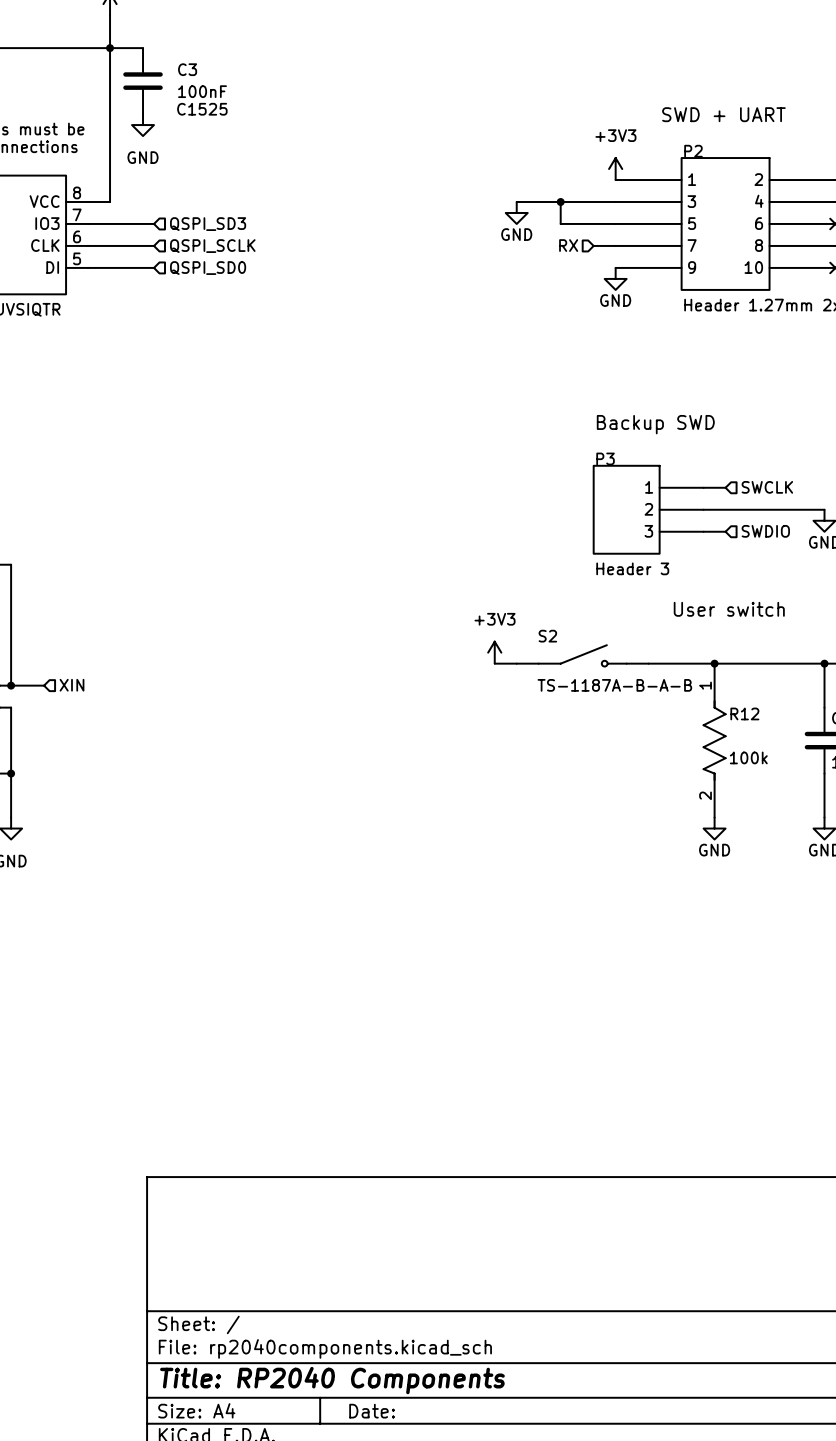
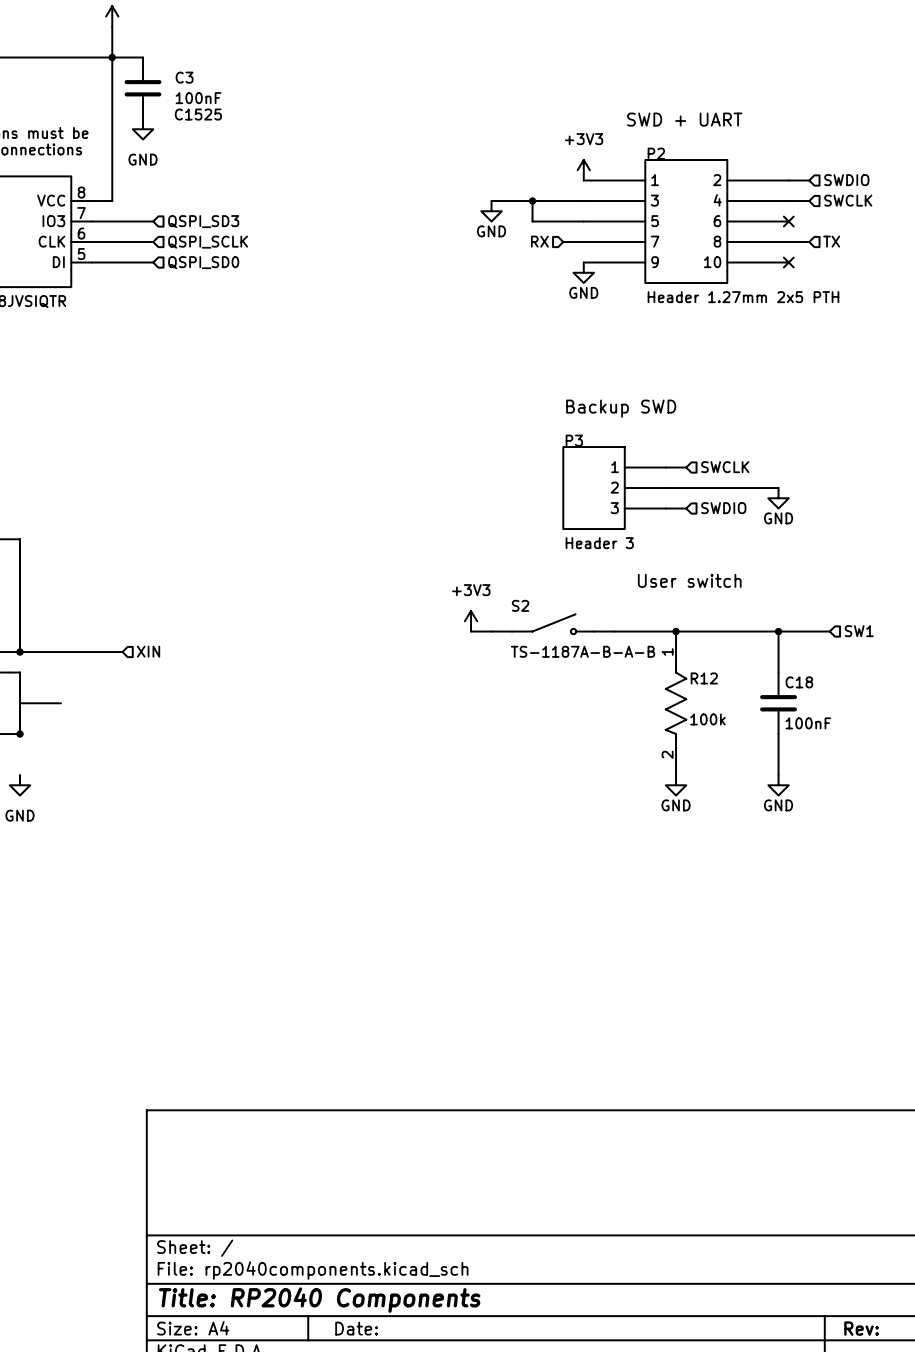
wire: none -> (50, 652) (122, 652)
hierarchical label position: XIN (72, 685) -> XIN (148, 651)
wire: none -> (20, 703) (61, 703)
wire: (11, 773) (11, 817) -> none

